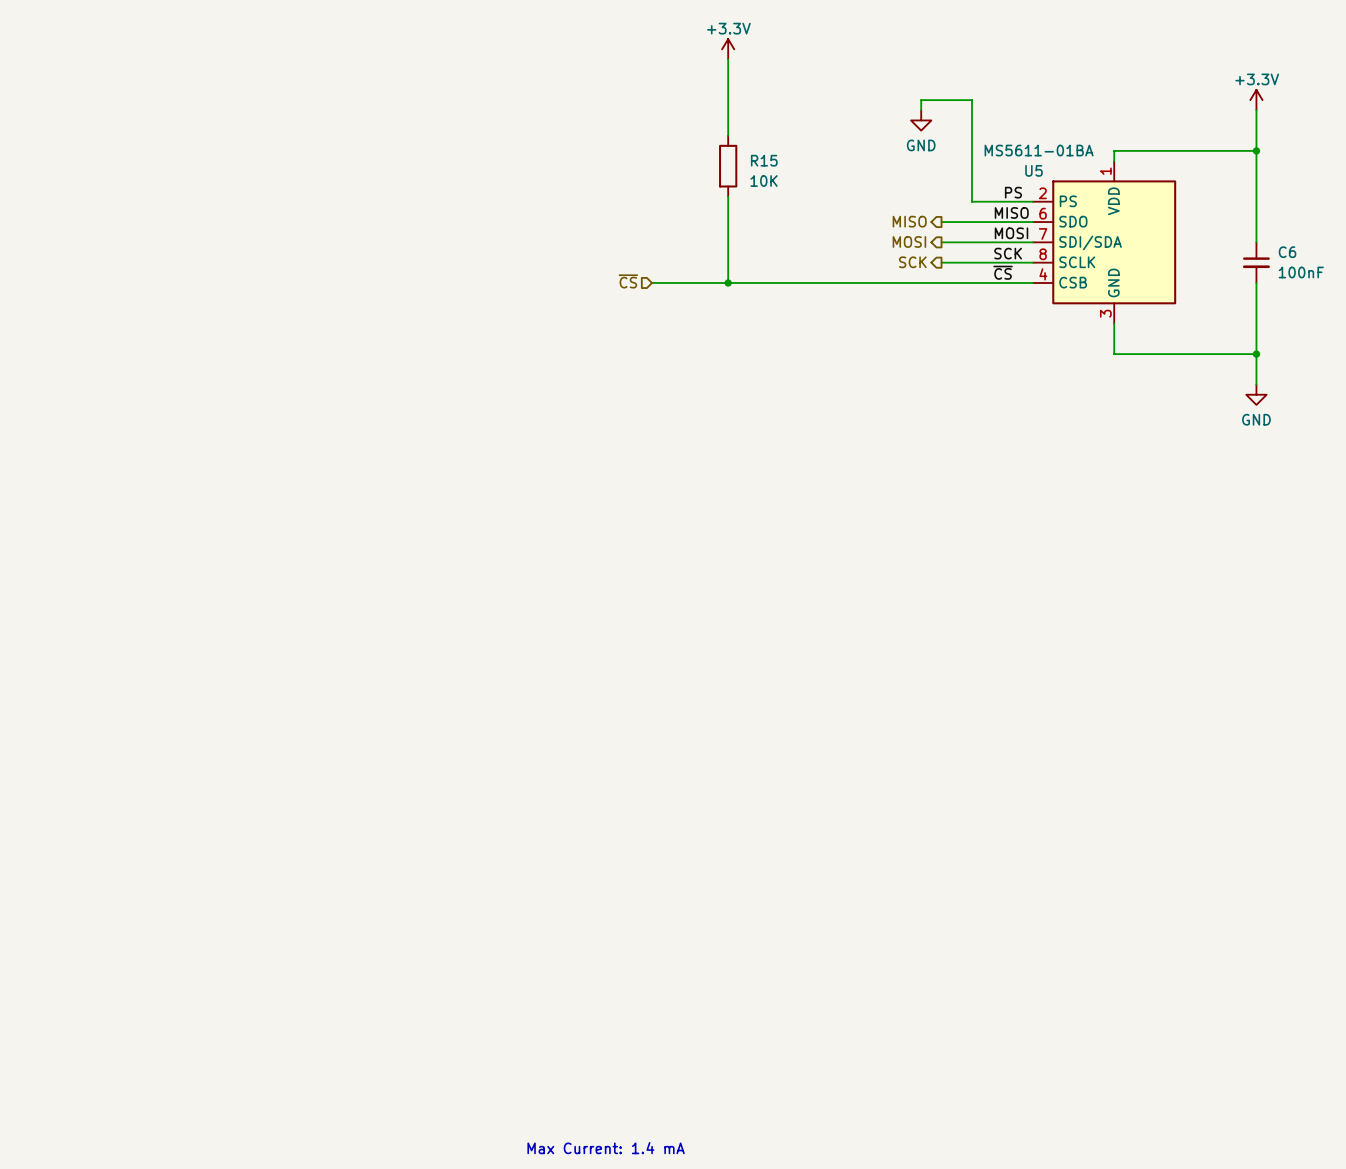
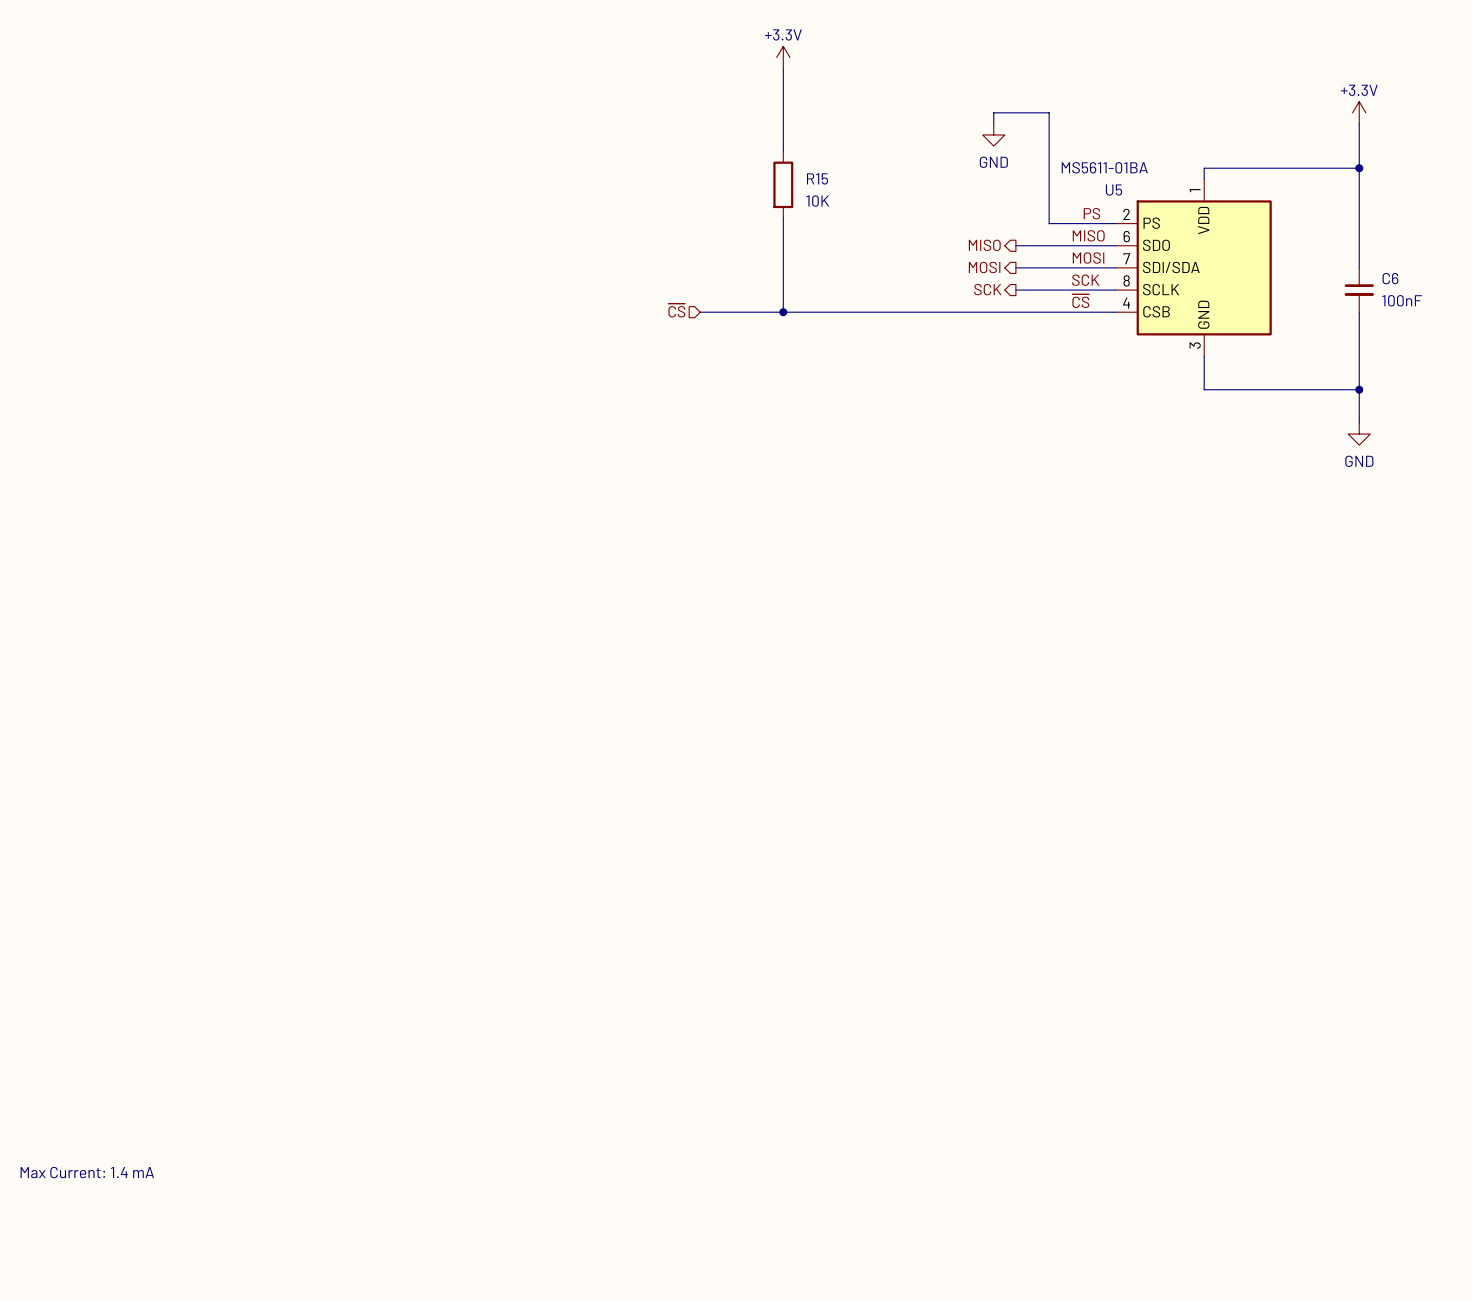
text: none -> Max Current: 1.4 mA (87, 1172)
text: Max Current: 1.4 mA (606, 1148) -> none

